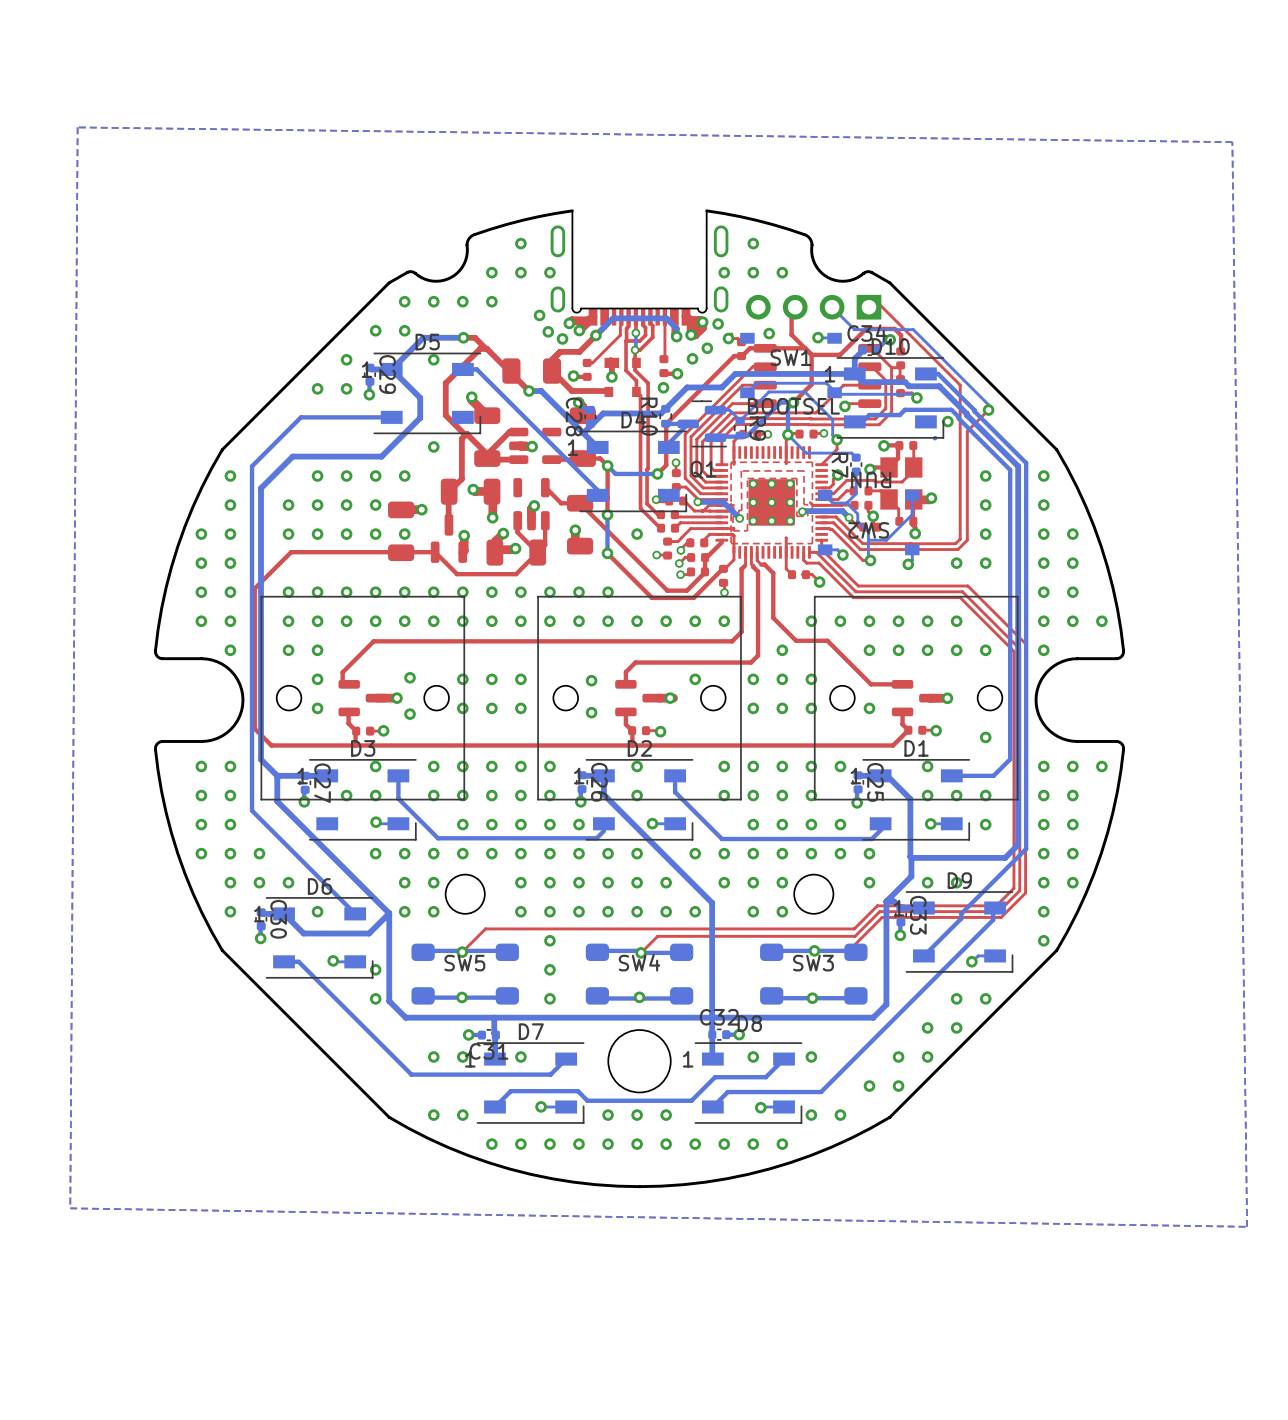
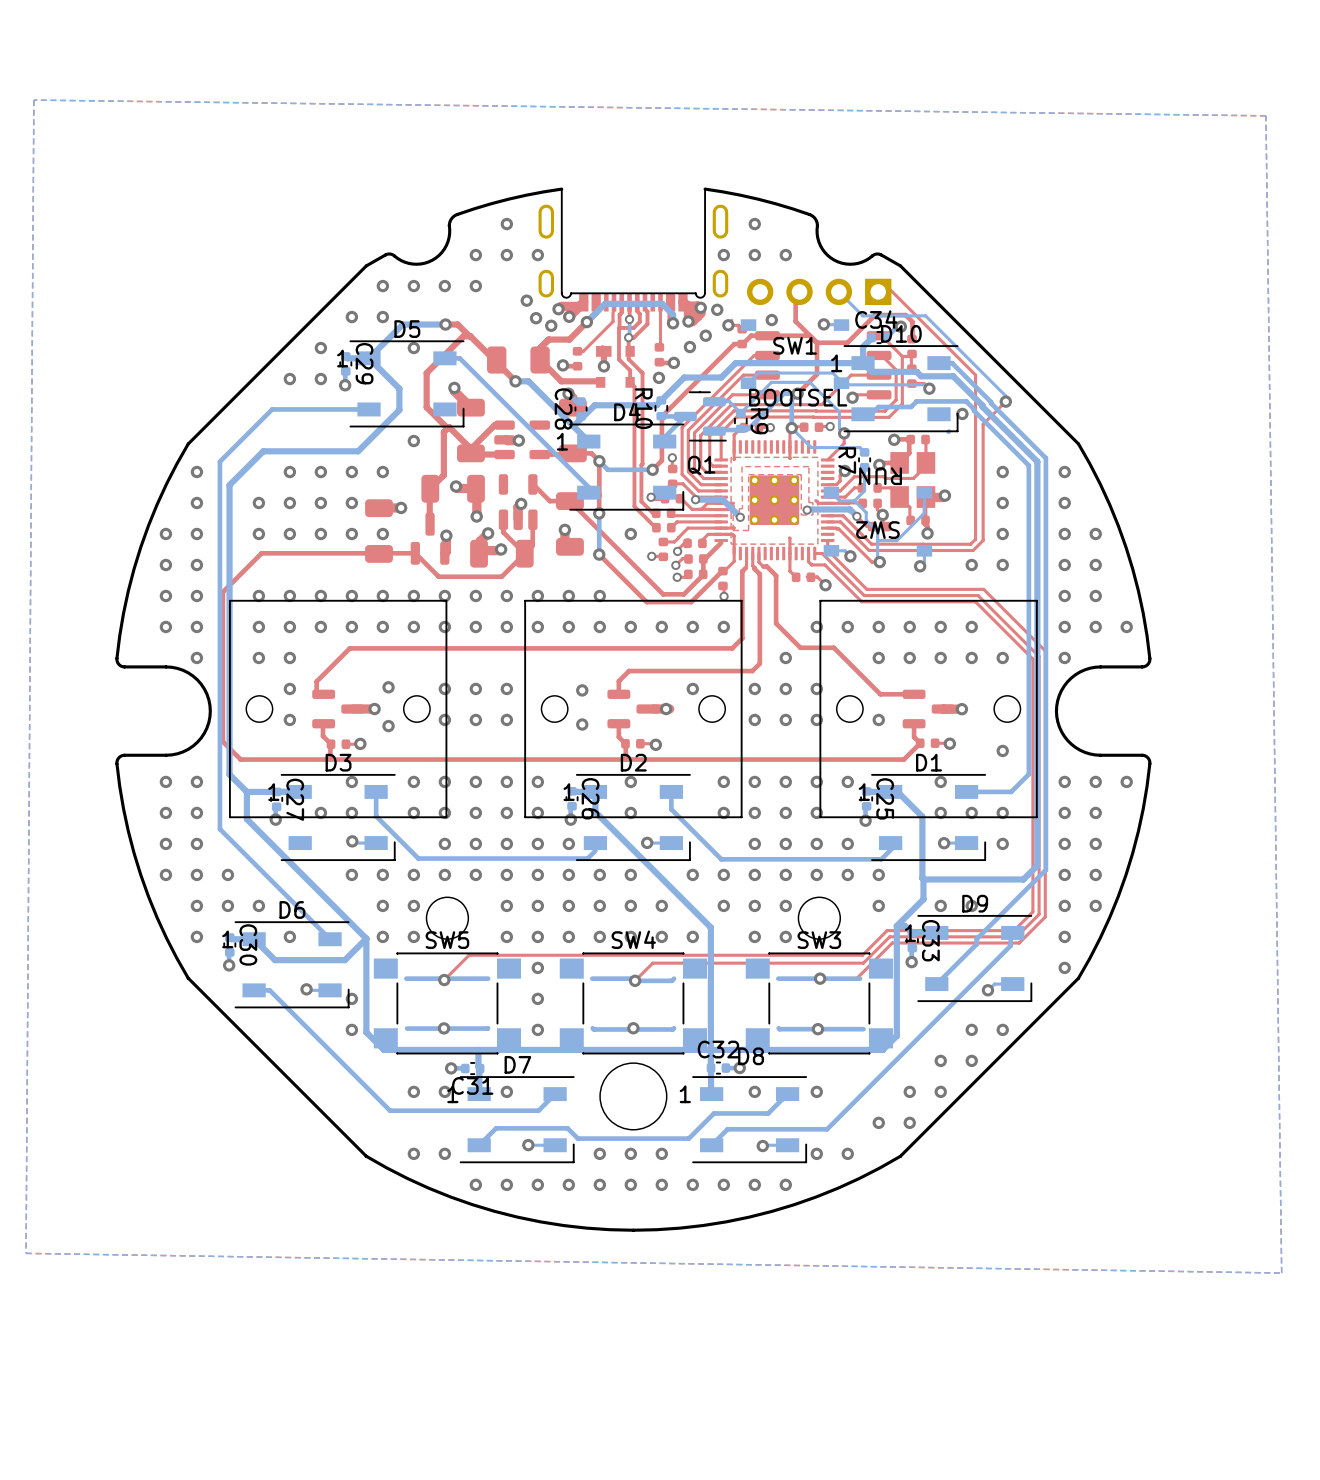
SW5 footprint: [411, 943, 519, 1005] -> [373, 952, 522, 1055]
SW4 footprint: [585, 943, 694, 1005] -> [559, 952, 708, 1055]
SW3 footprint: [760, 943, 868, 1005] -> [745, 952, 893, 1055]
SW4 name position: SW4 (639, 962) -> SW4 (633, 939)
SW5 name position: SW5 (464, 963) -> SW5 (447, 940)
SW3 name position: SW3 (813, 963) -> SW3 (819, 940)

